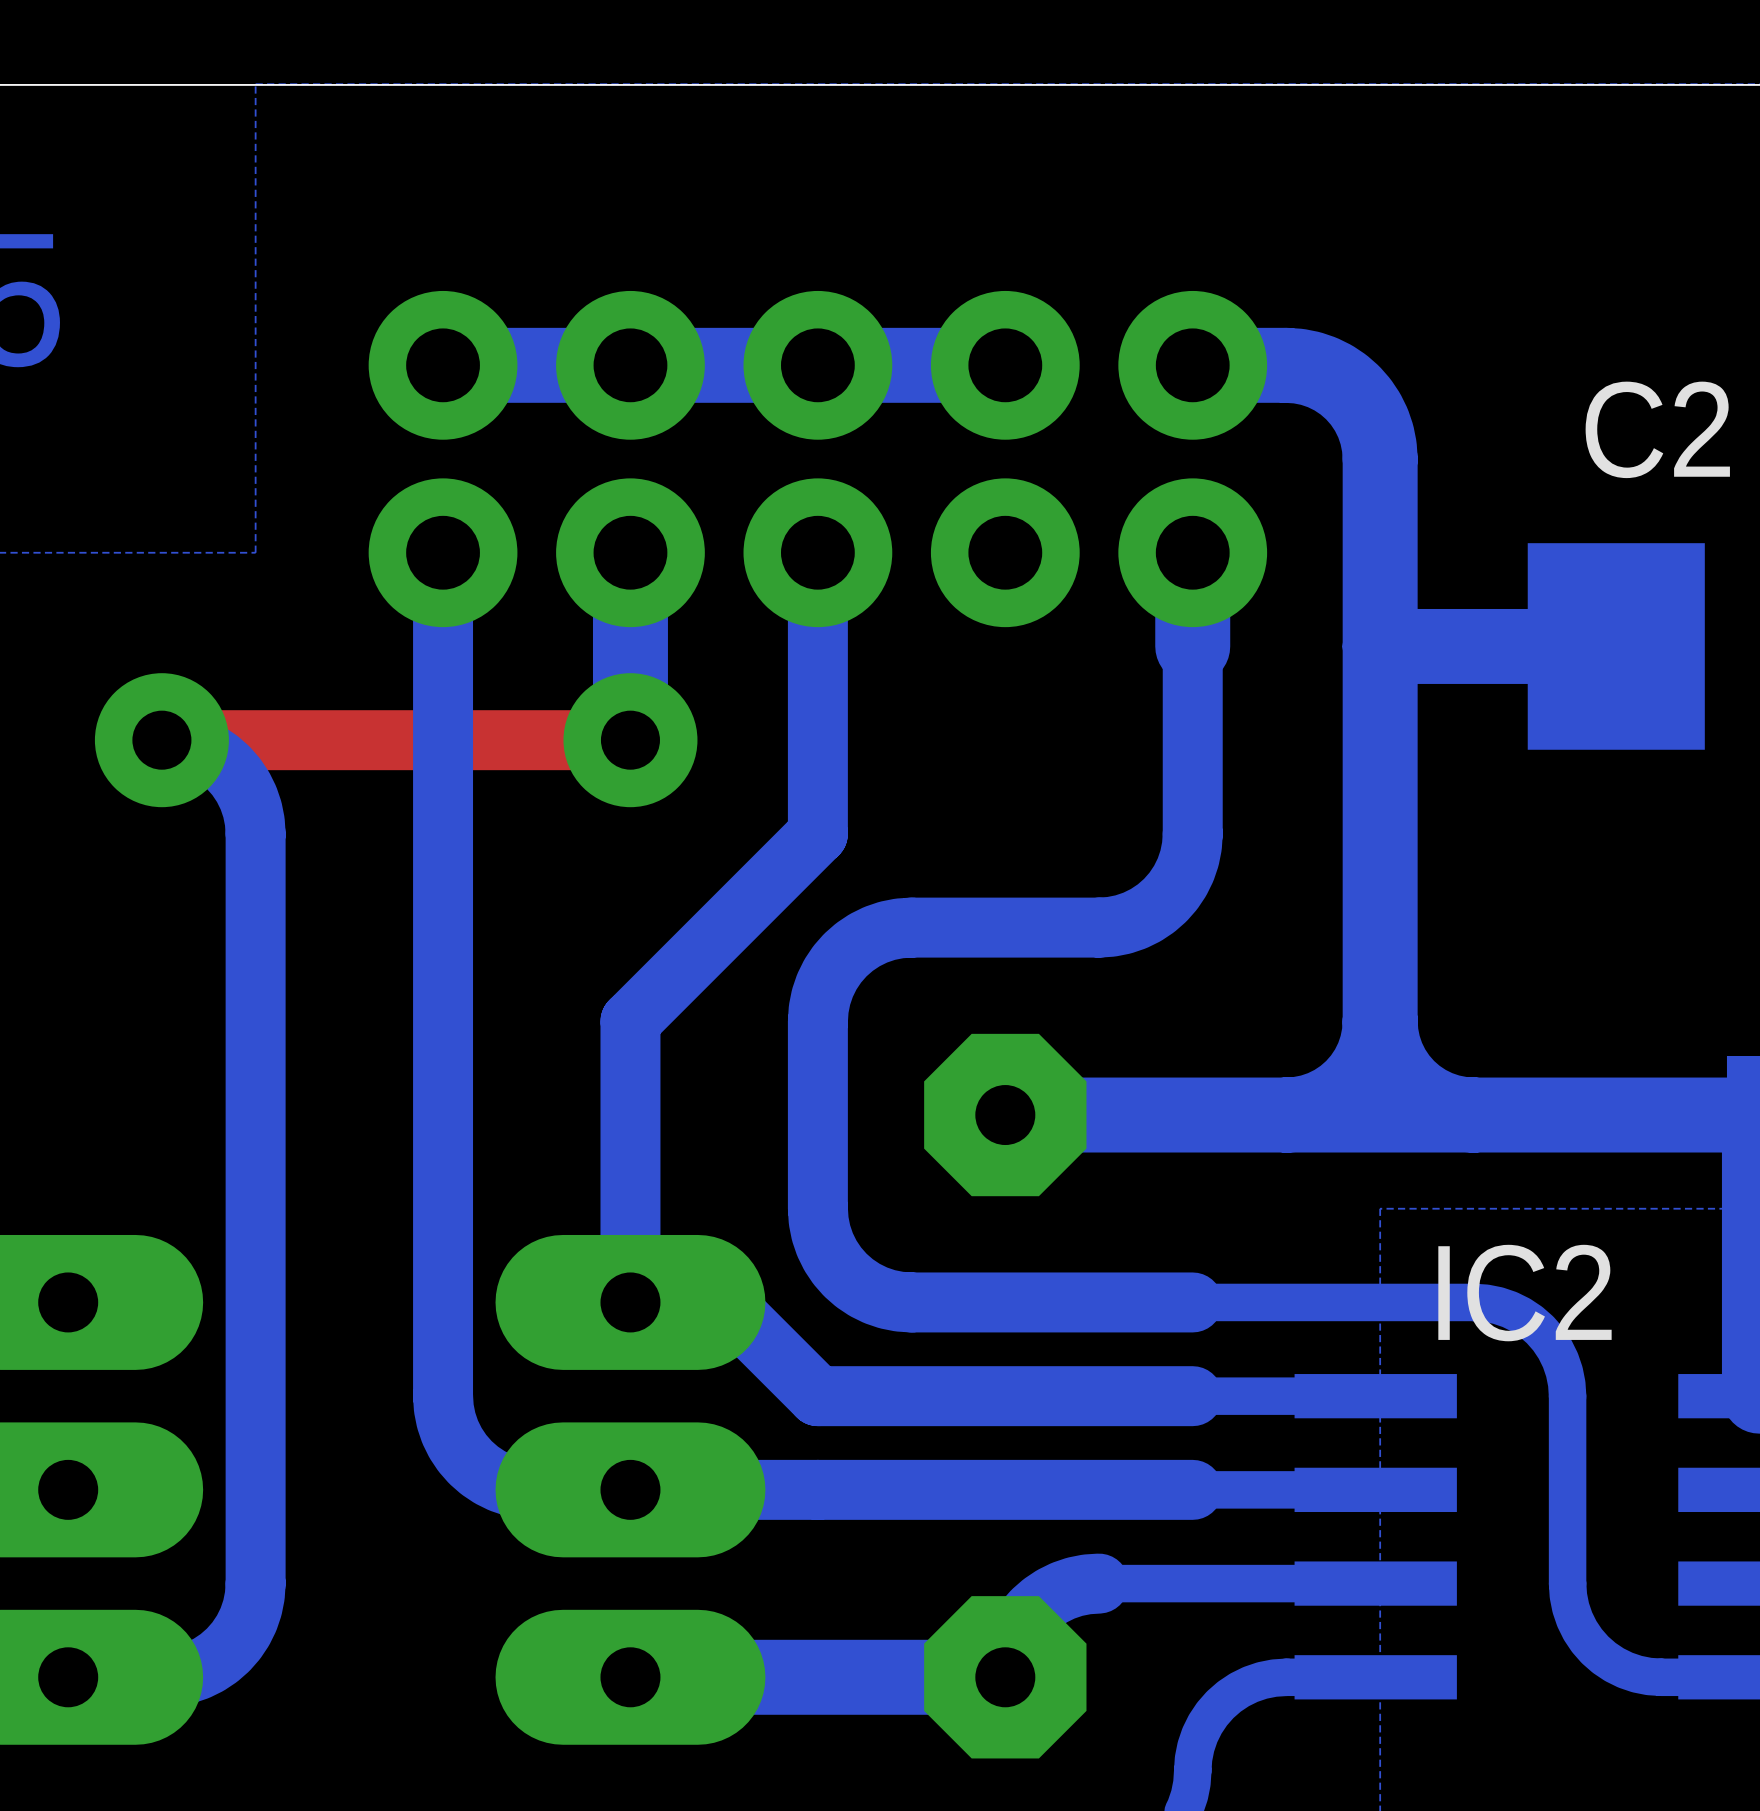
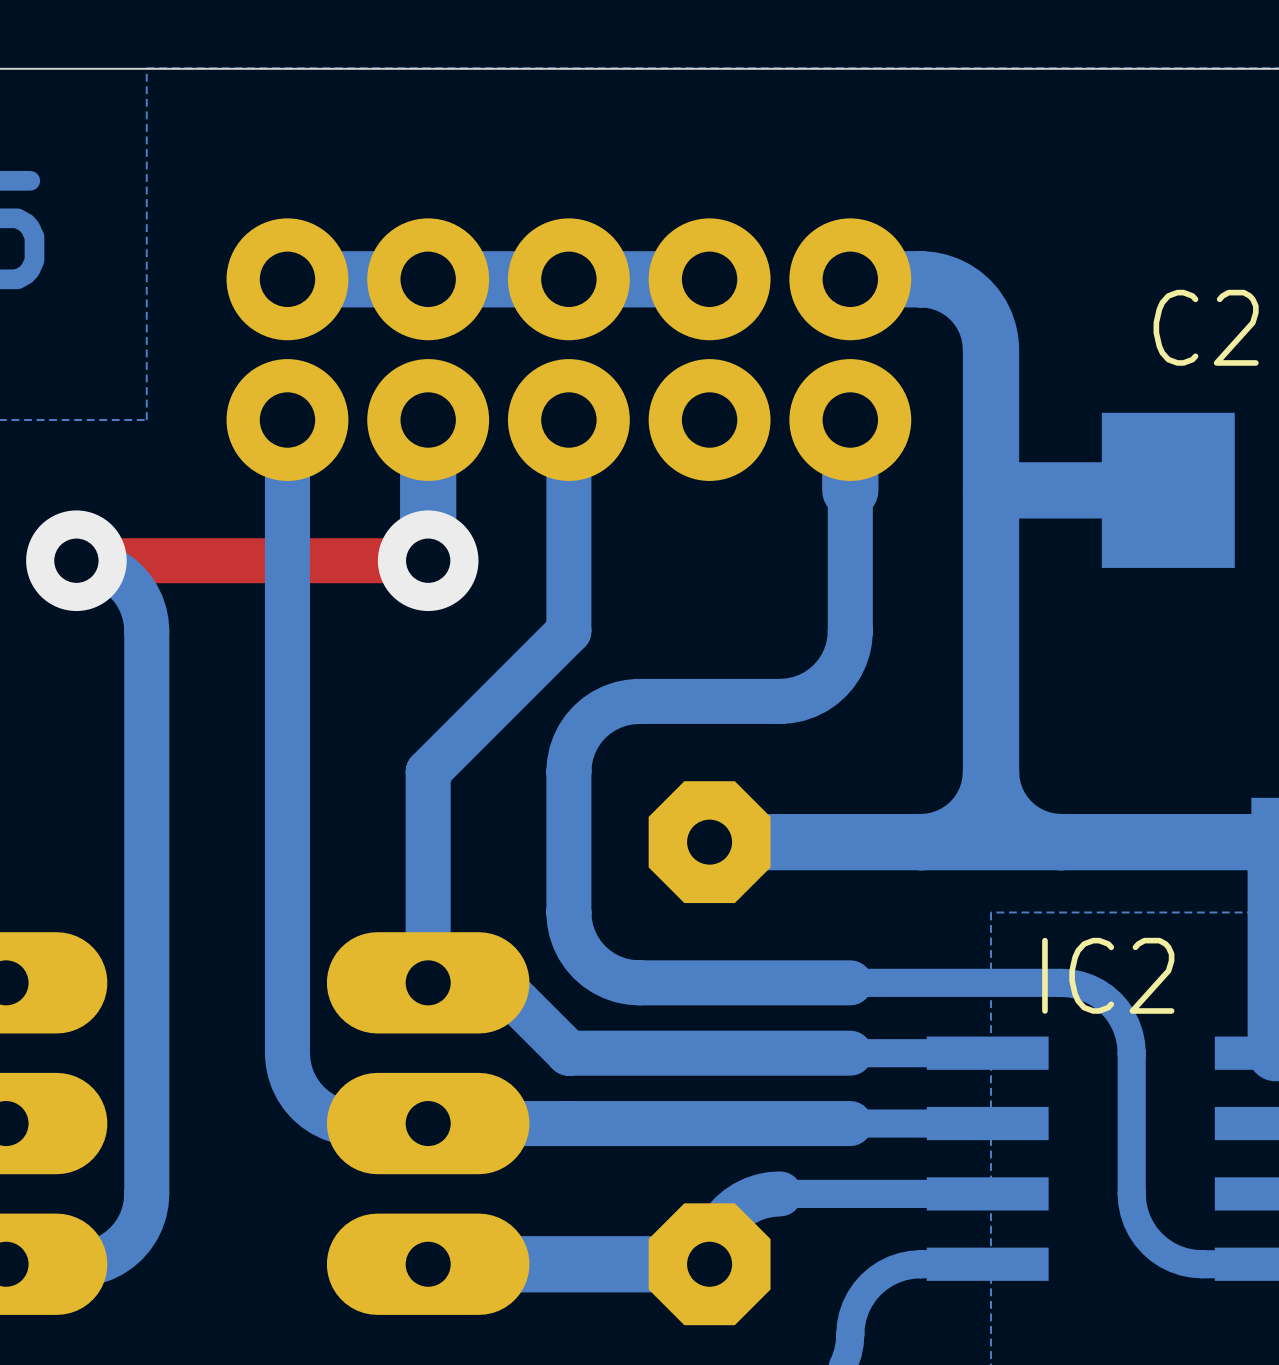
part footprint: [368, 290, 1268, 628] -> [226, 218, 912, 481]

